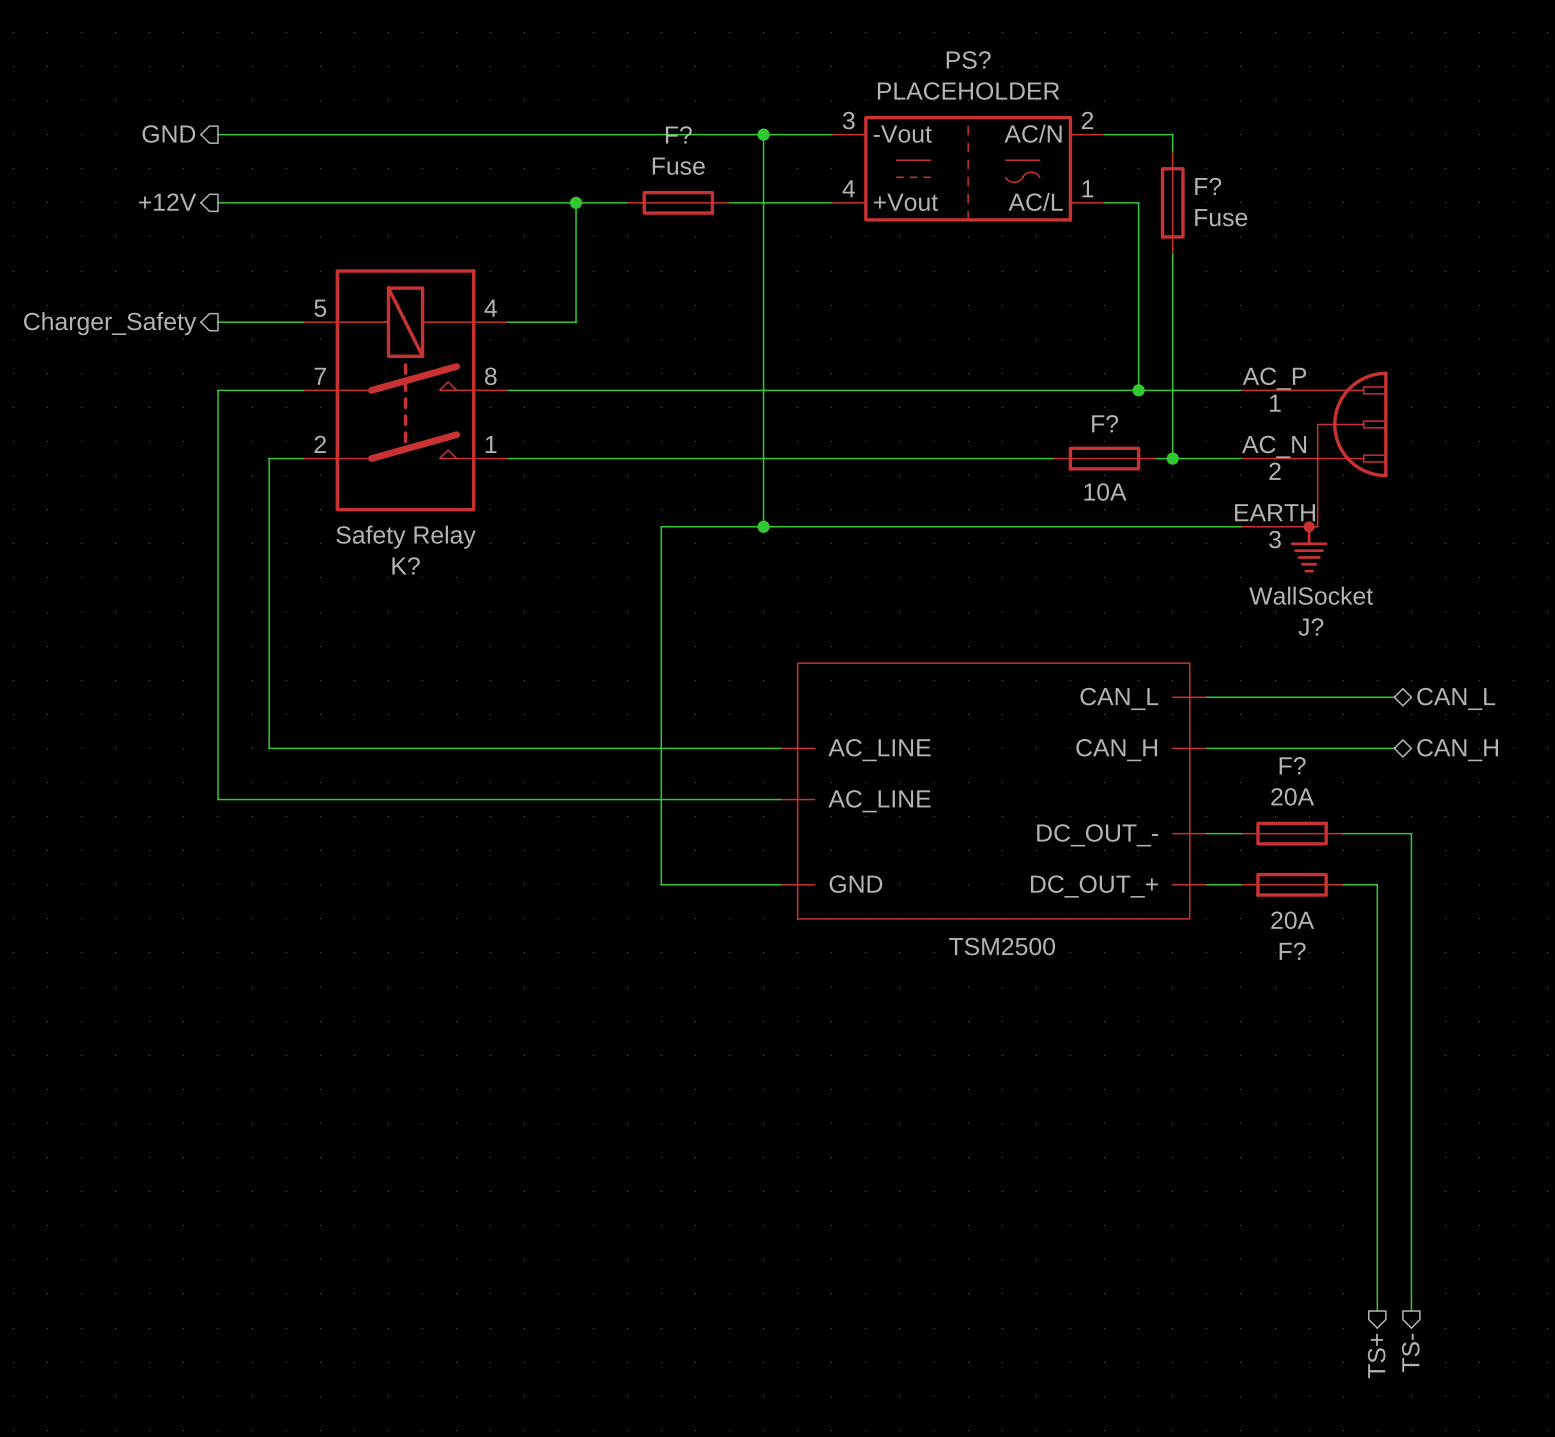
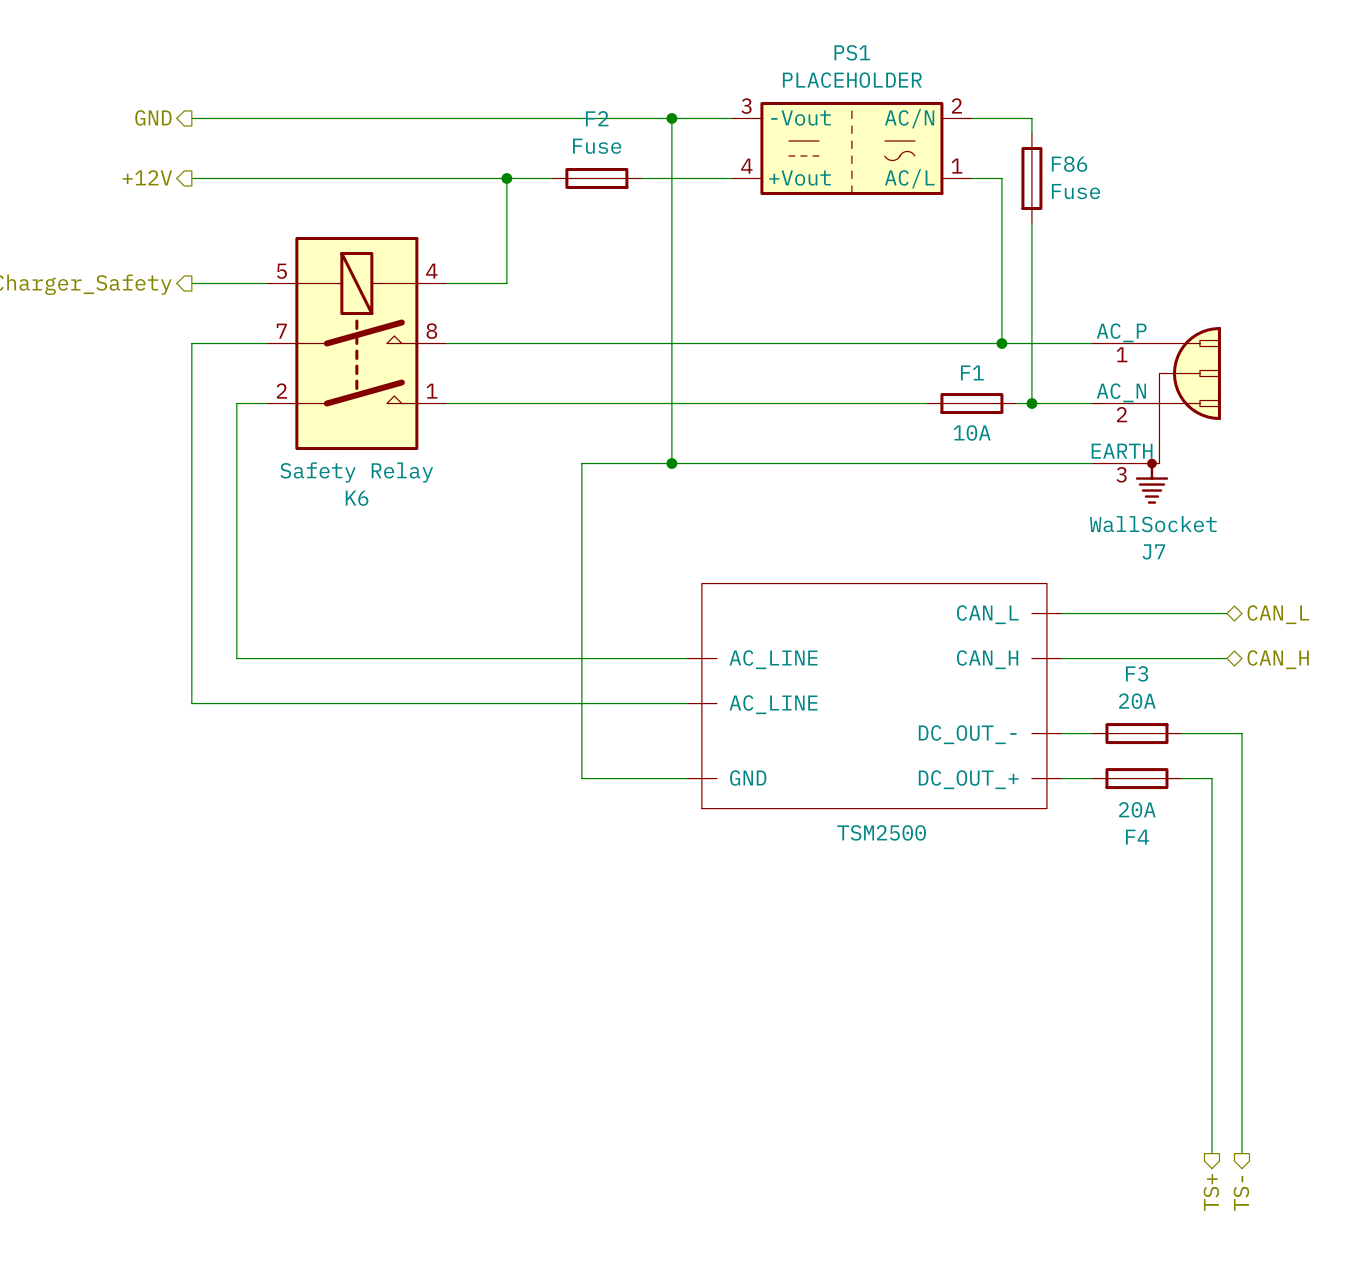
PS? name: PS? (968, 60) -> PS1 (852, 52)
F? name: F? (678, 134) -> F2 (597, 118)
F? name: F? (1208, 186) -> F86 (1069, 164)
F? name: F? (1105, 423) -> F1 (972, 372)
K? name: K? (406, 565) -> K6 (357, 498)
J? name: J? (1310, 627) -> J7 (1153, 551)
F? name: F? (1292, 765) -> F3 (1137, 673)
F? name: F? (1292, 951) -> F4 (1137, 837)

